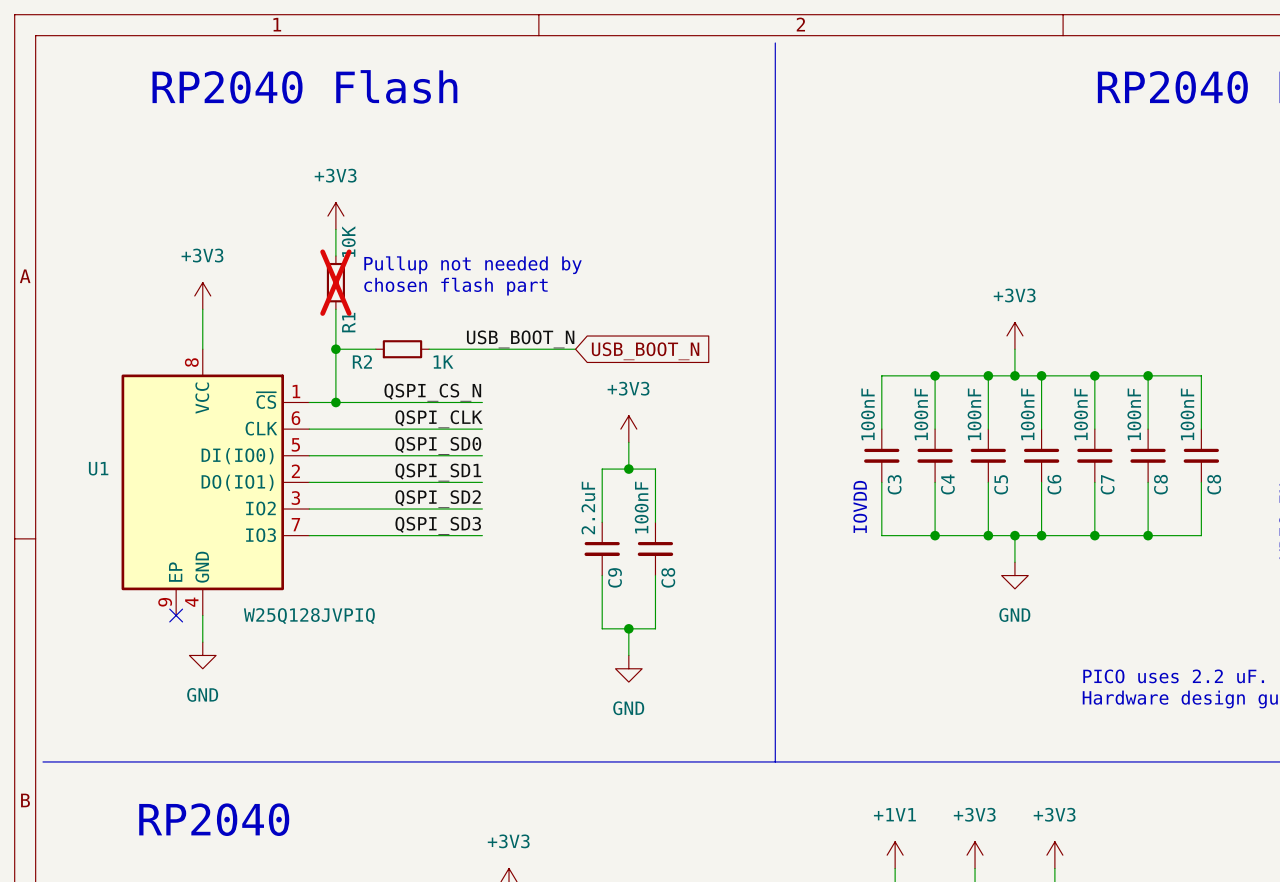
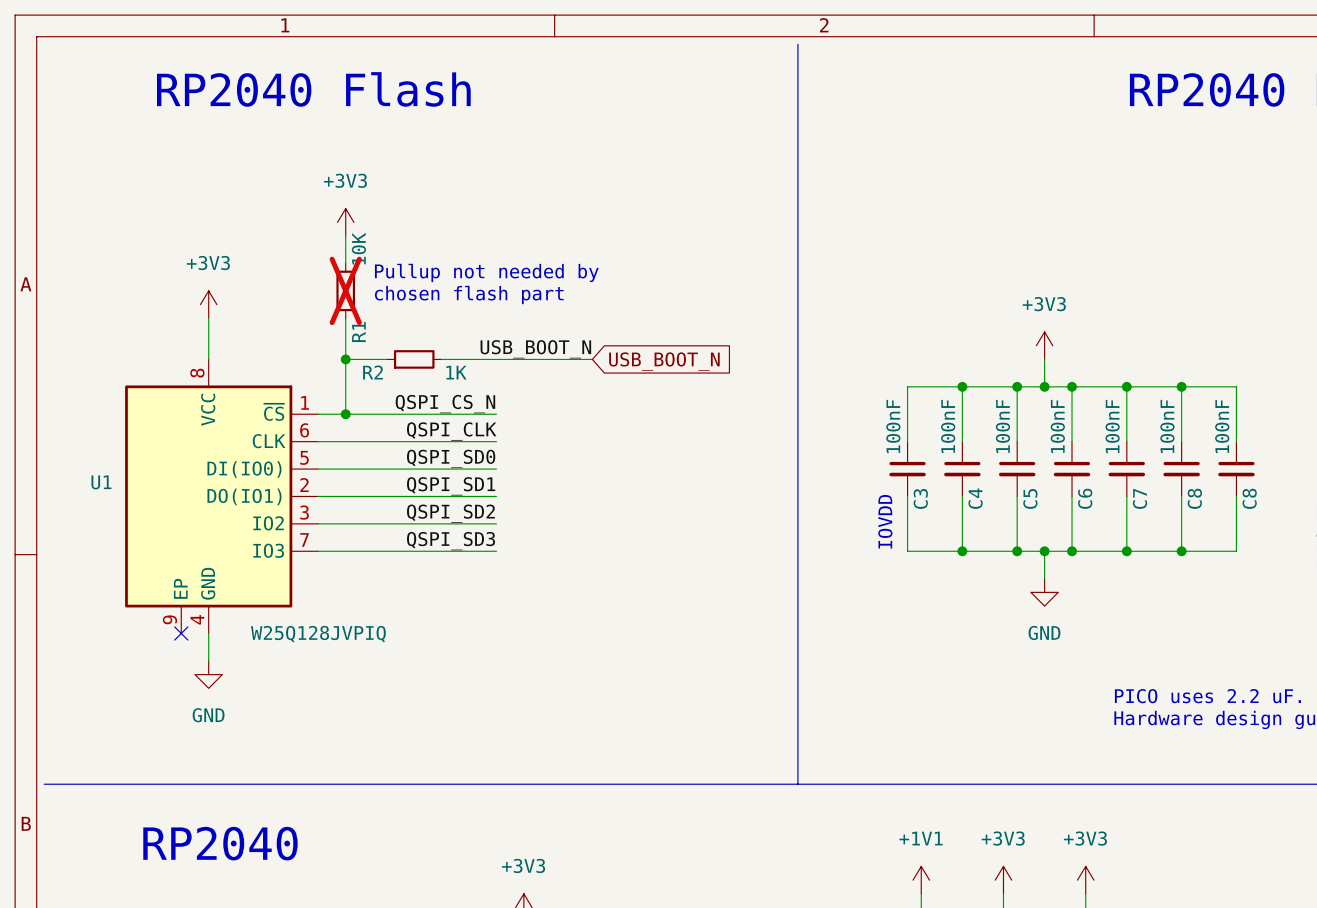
power symbol: +3V3 (628, 429) -> none
wire: (628, 442) (628, 469) -> none
junction: (628, 469) -> none
wire: (602, 522) (602, 469) (655, 469) (655, 522) -> none
C9: 2.2uF (602, 548) -> none
C8: 100nF (655, 548) -> none
wire: (602, 575) (602, 628) (655, 628) (655, 575) -> none
wire: (628, 628) (628, 655) -> none
junction: (628, 628) -> none
power symbol: GND (628, 668) -> none

